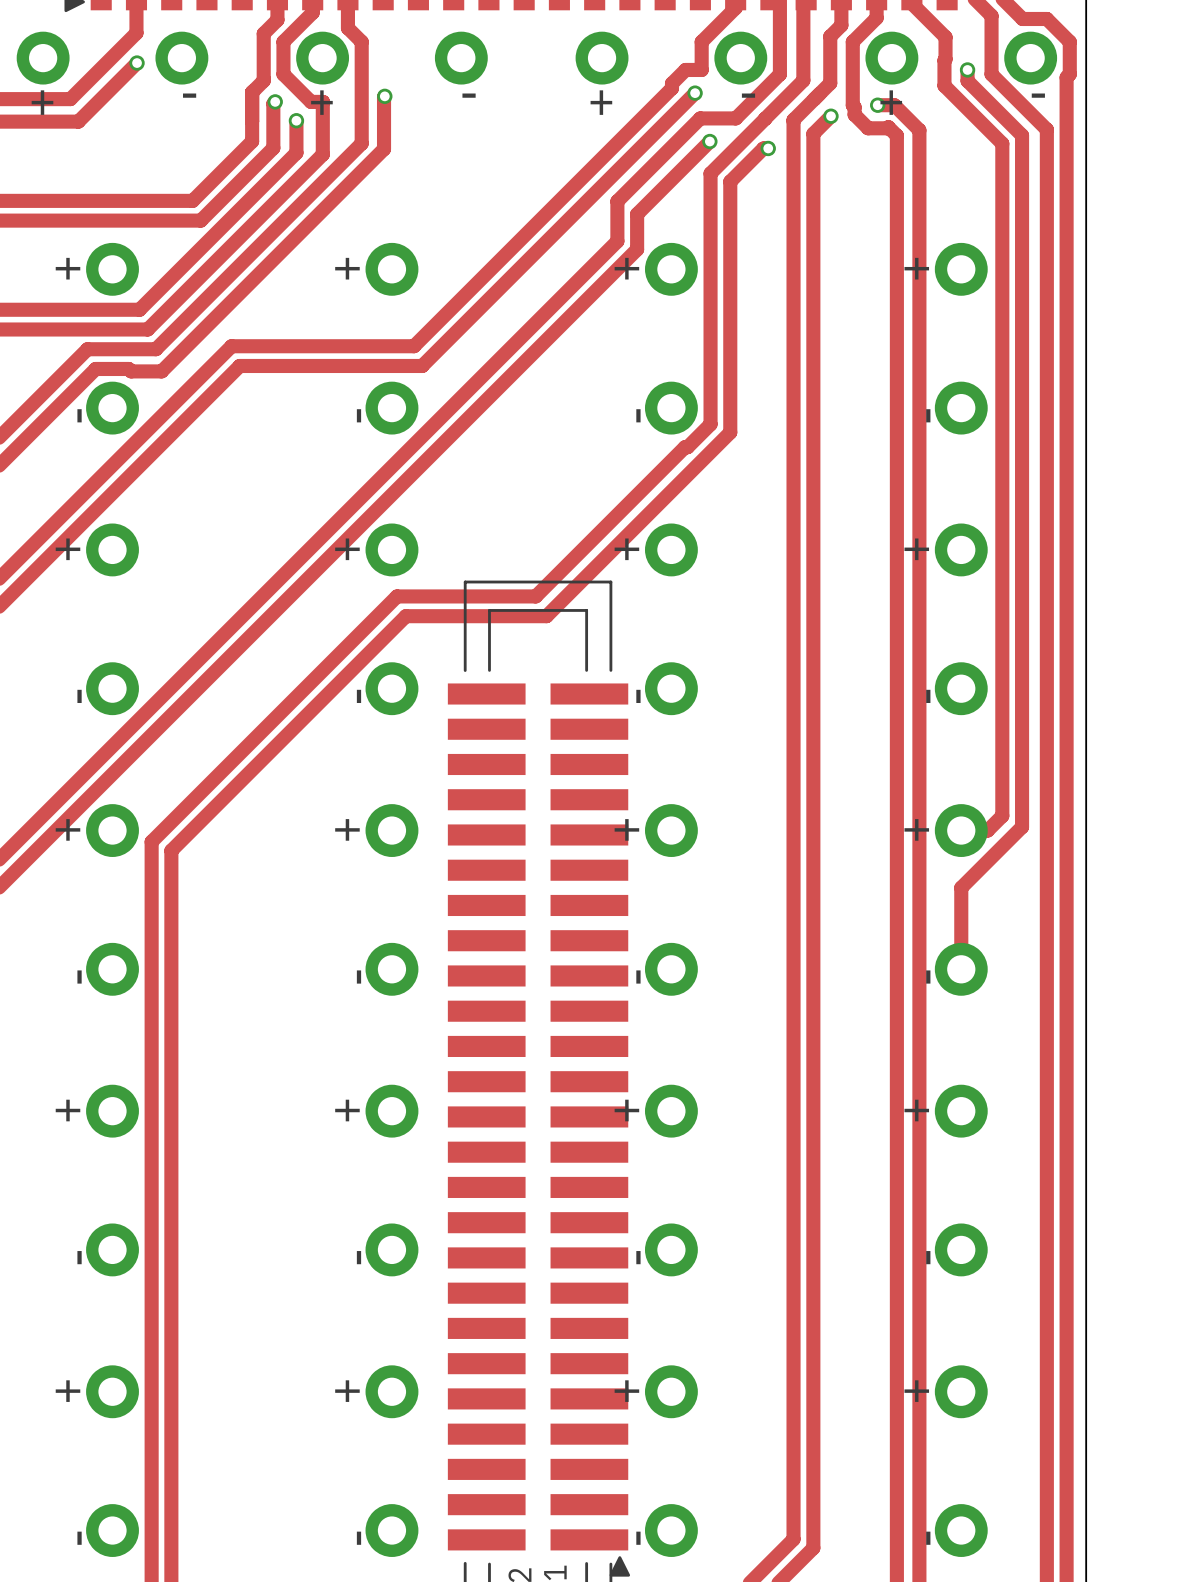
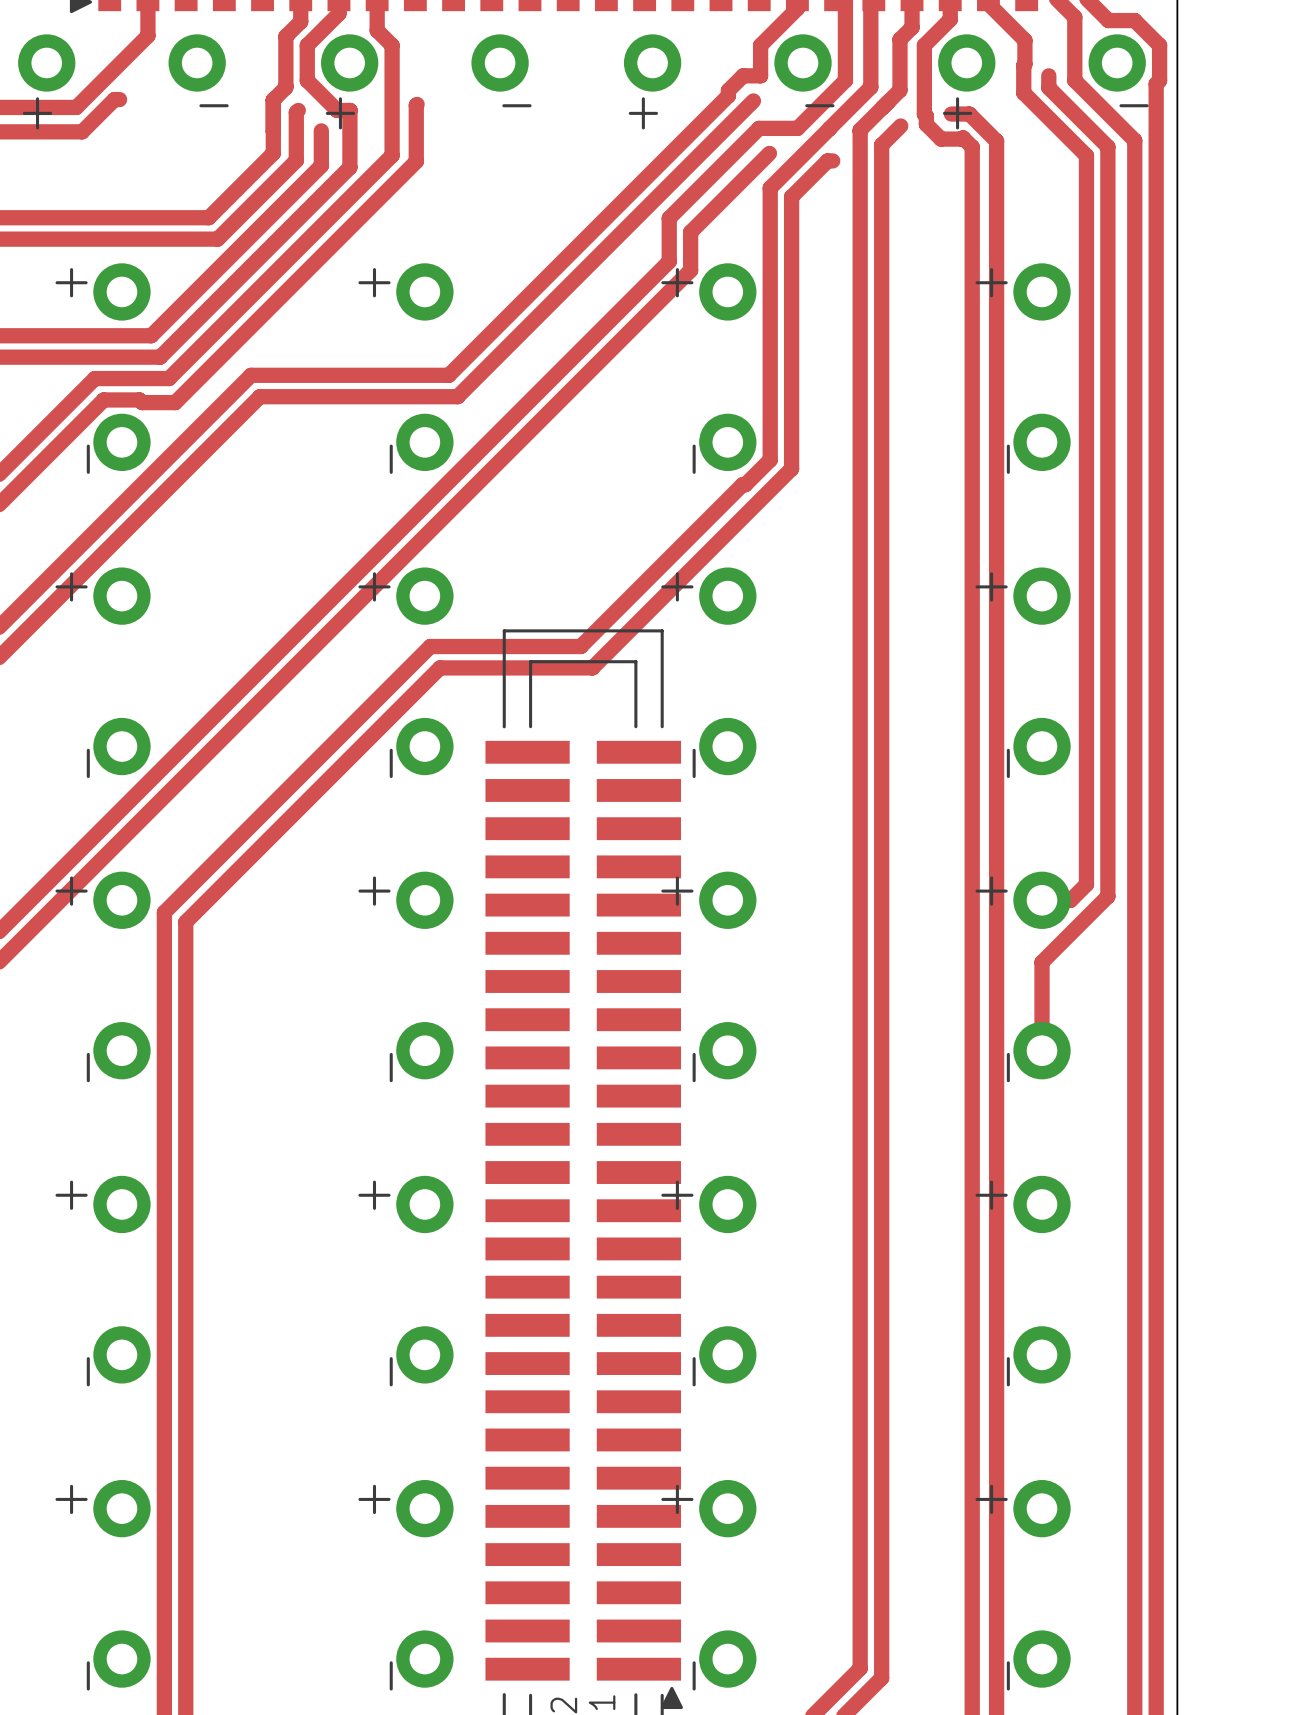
top track: (137, 63) (78, 121) (75, 121) -> (119, 99) (114, 99) (82, 131)
via: (137, 63) -> none
via: (967, 69) -> none
via: (695, 93) -> none
via: (384, 96) -> none
via: (275, 101) -> none
via: (877, 105) -> none
via: (830, 116) -> none
via: (296, 120) -> none
via: (709, 141) -> none
via: (768, 148) -> none

